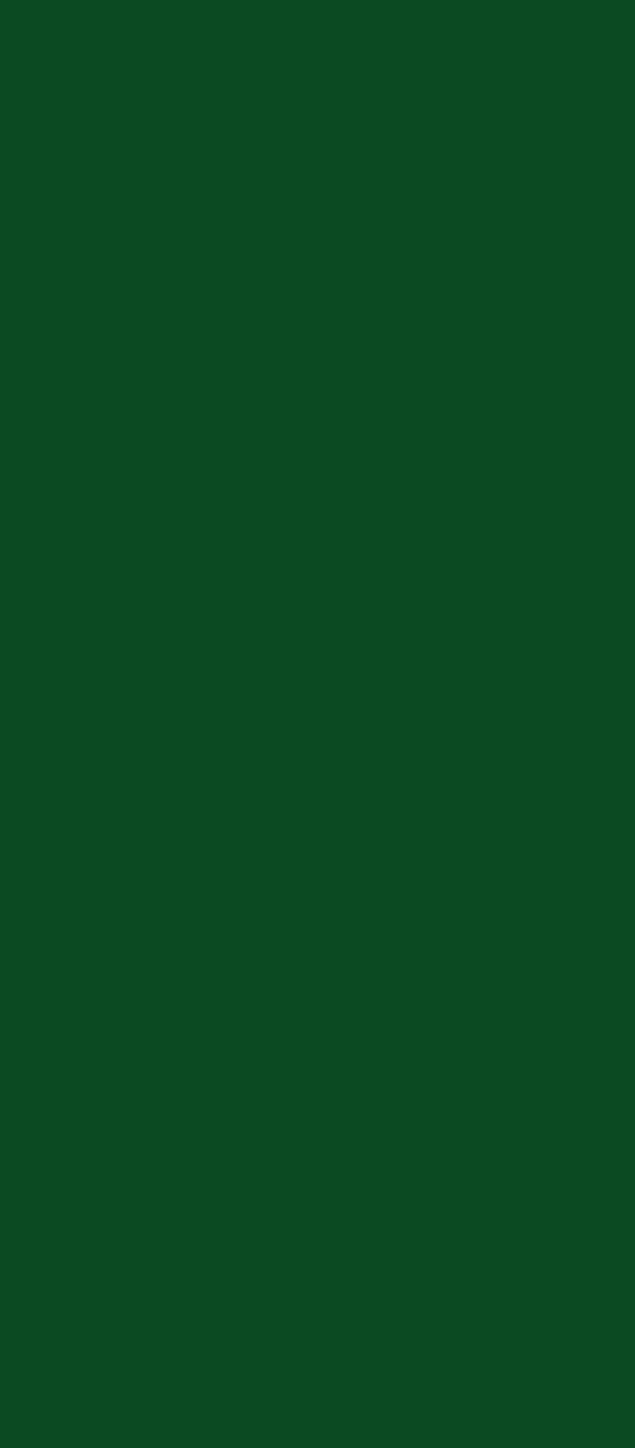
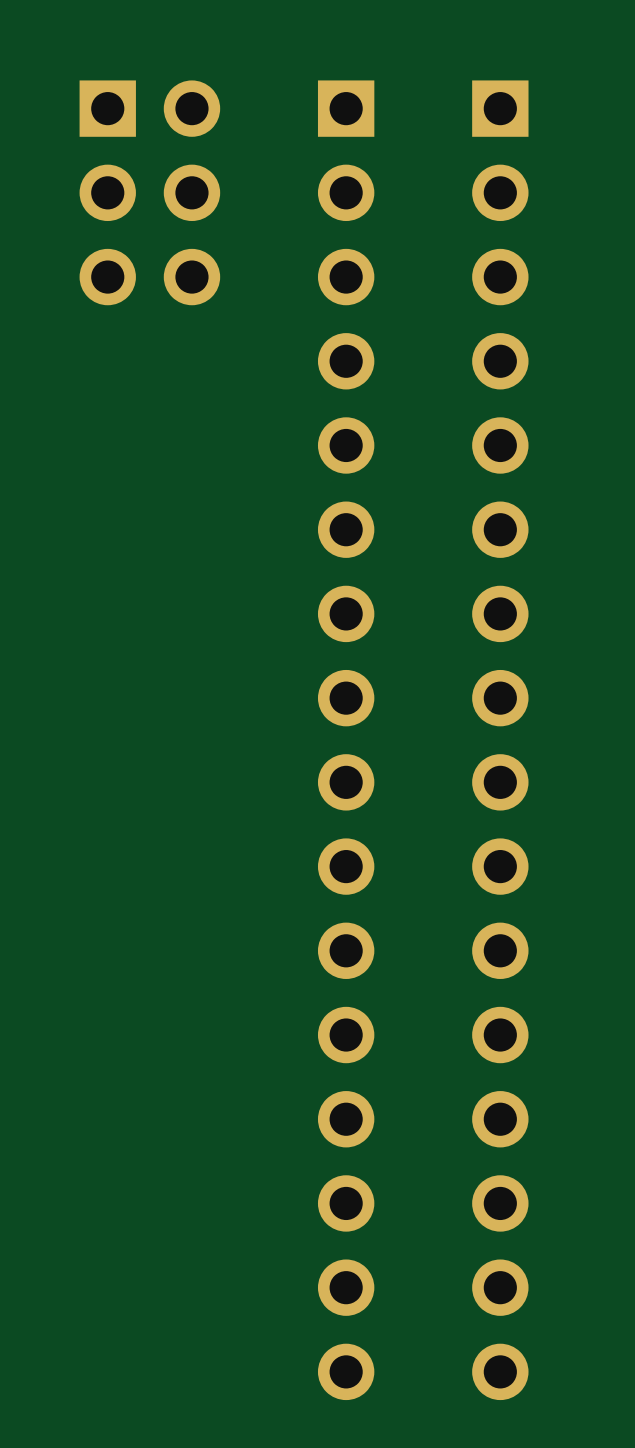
part: none -> (149, 192)
part: none -> (346, 740)
part: none -> (500, 740)

